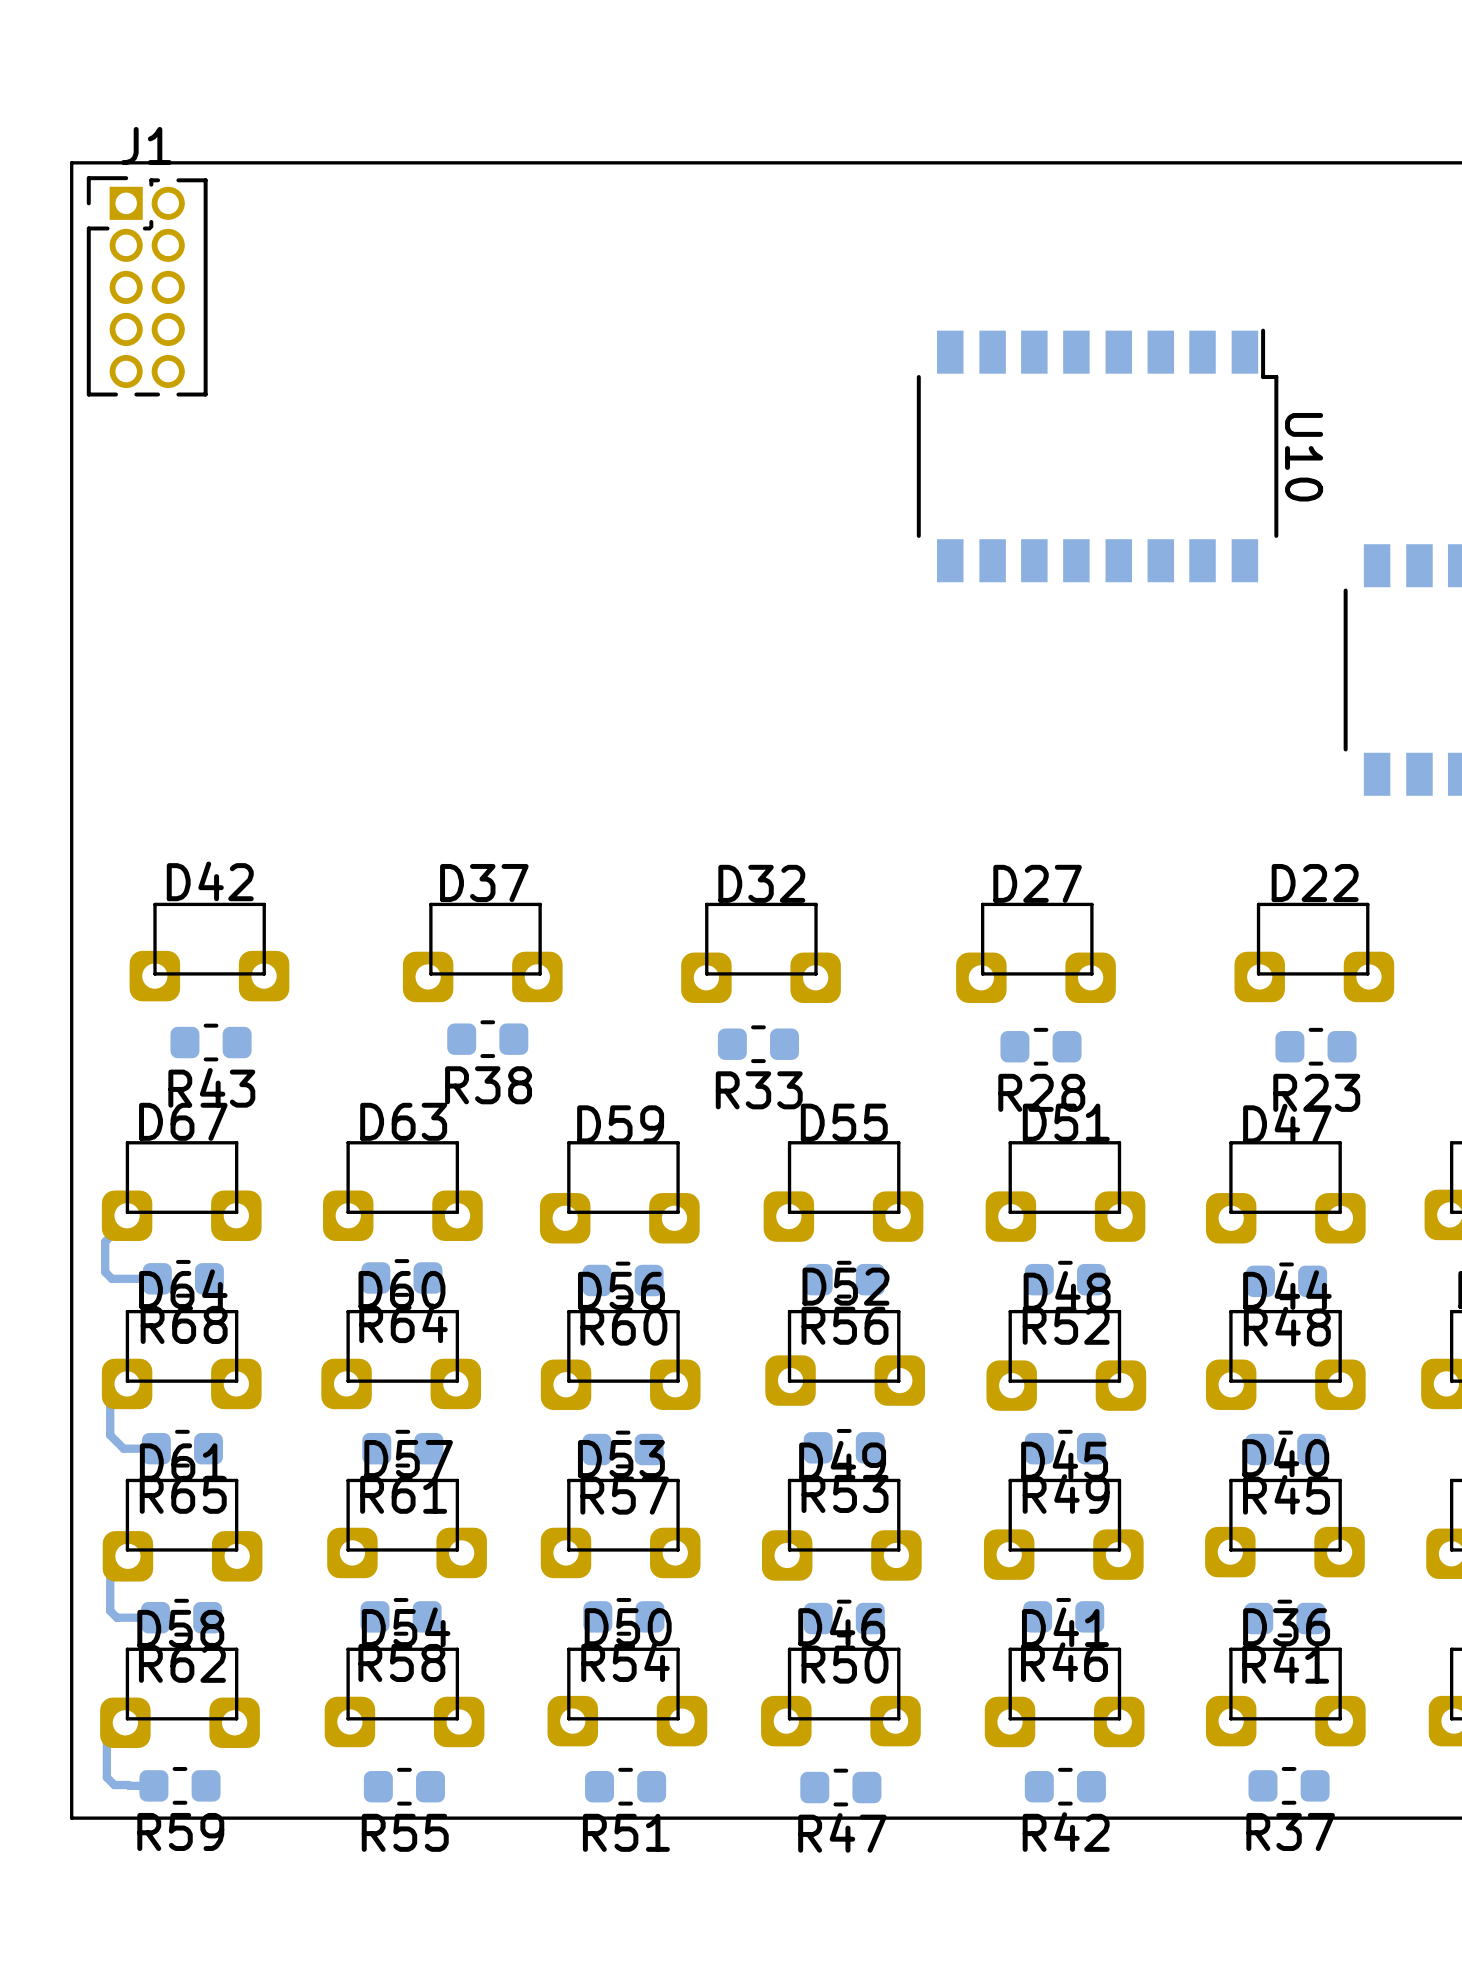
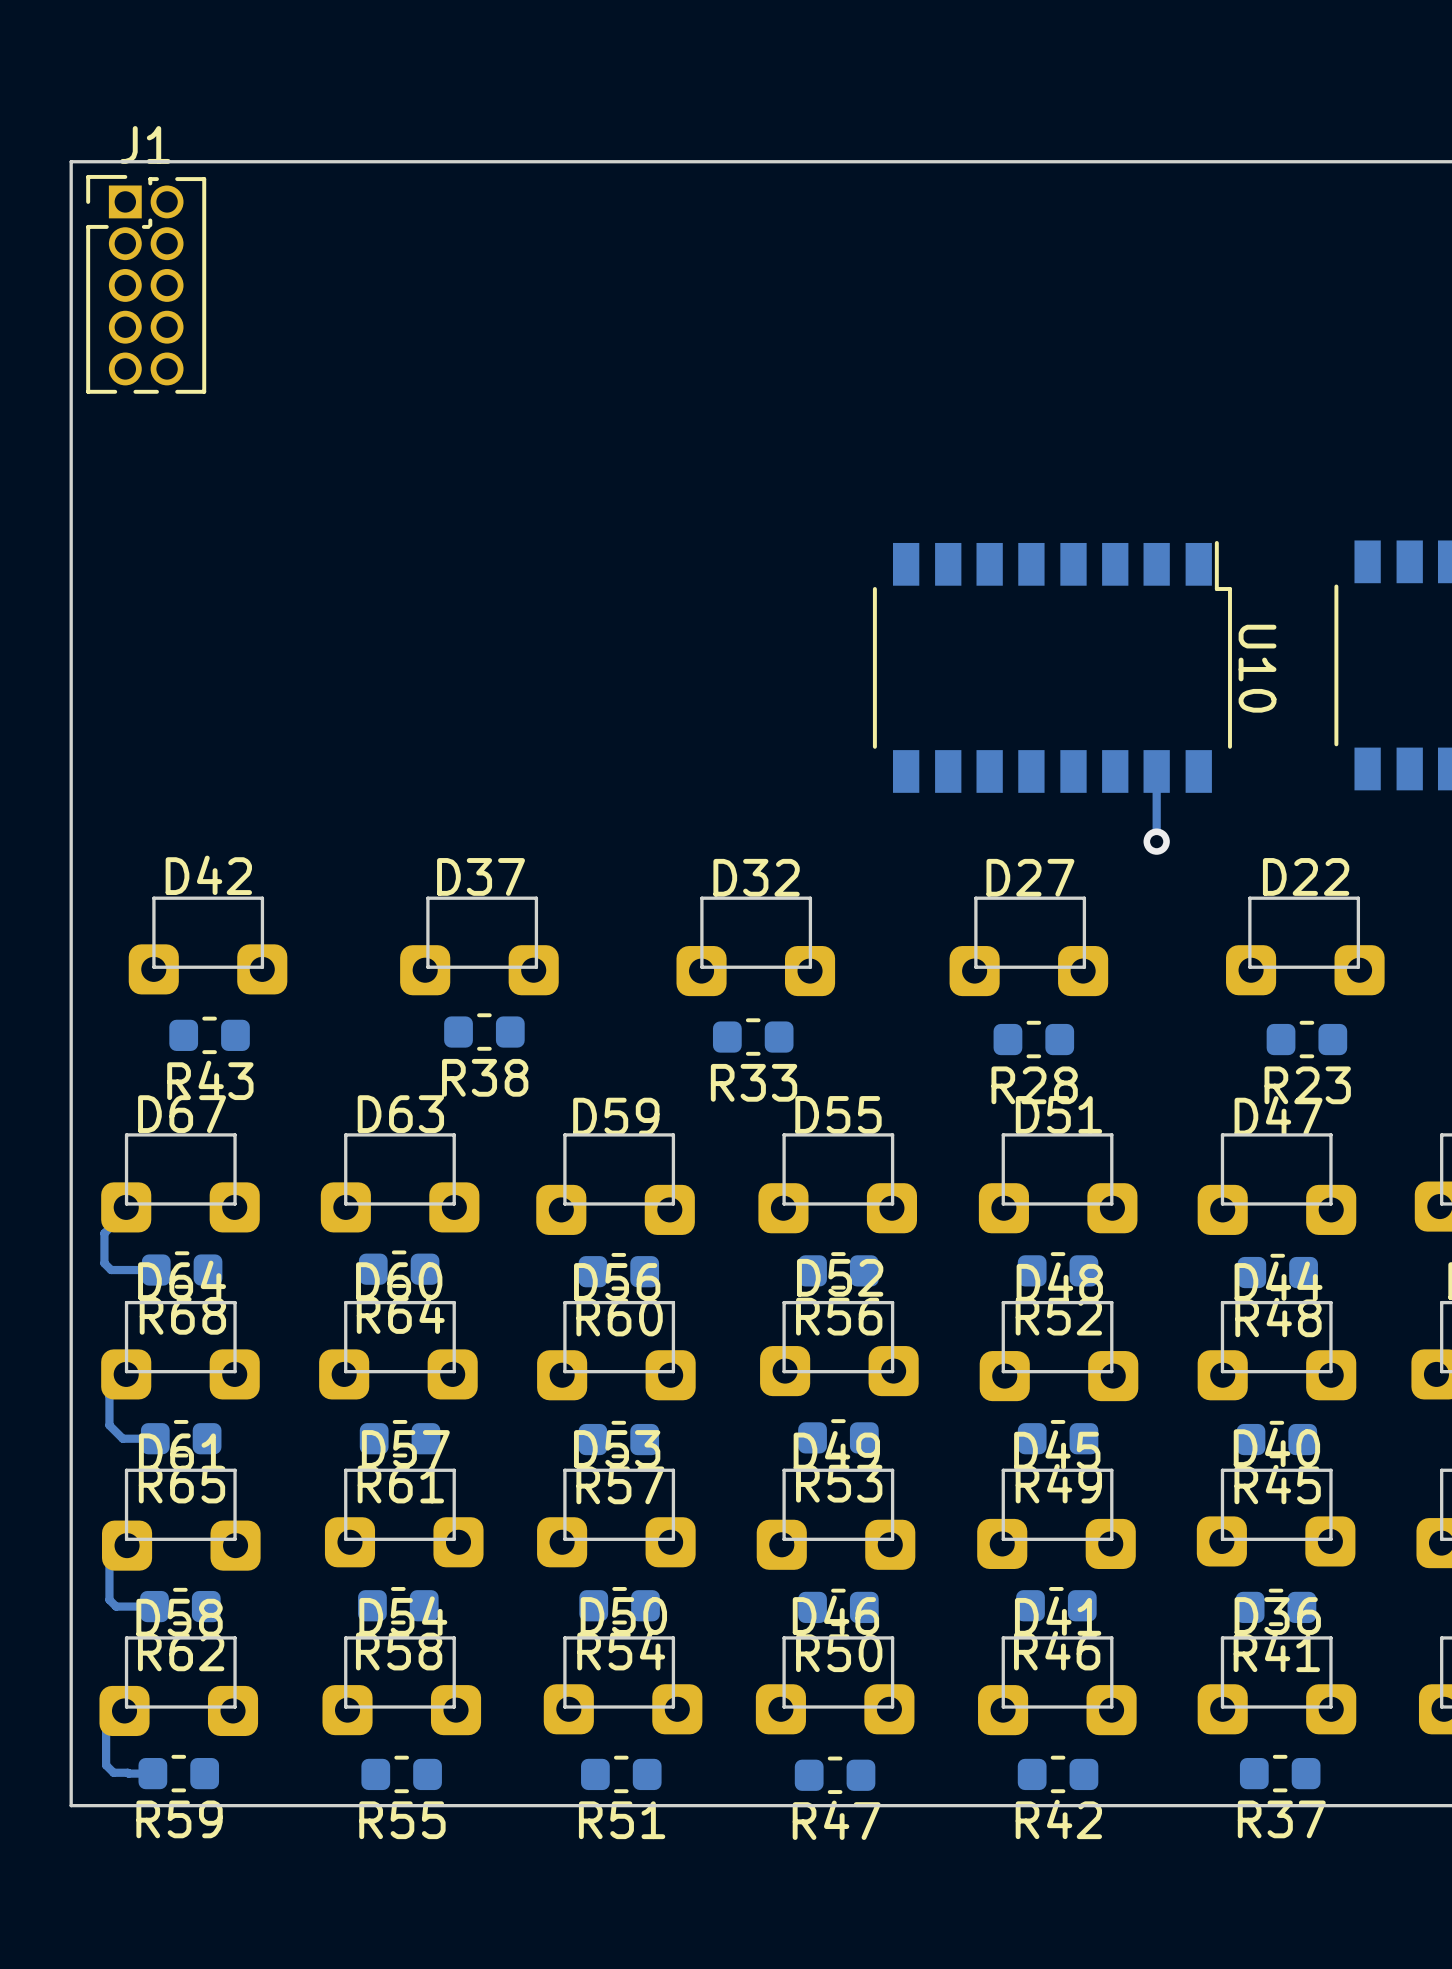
U10 position: (1097, 455) -> (1052, 666)
track: none -> (1156, 771) (1156, 841)
via: none -> (1156, 841)

